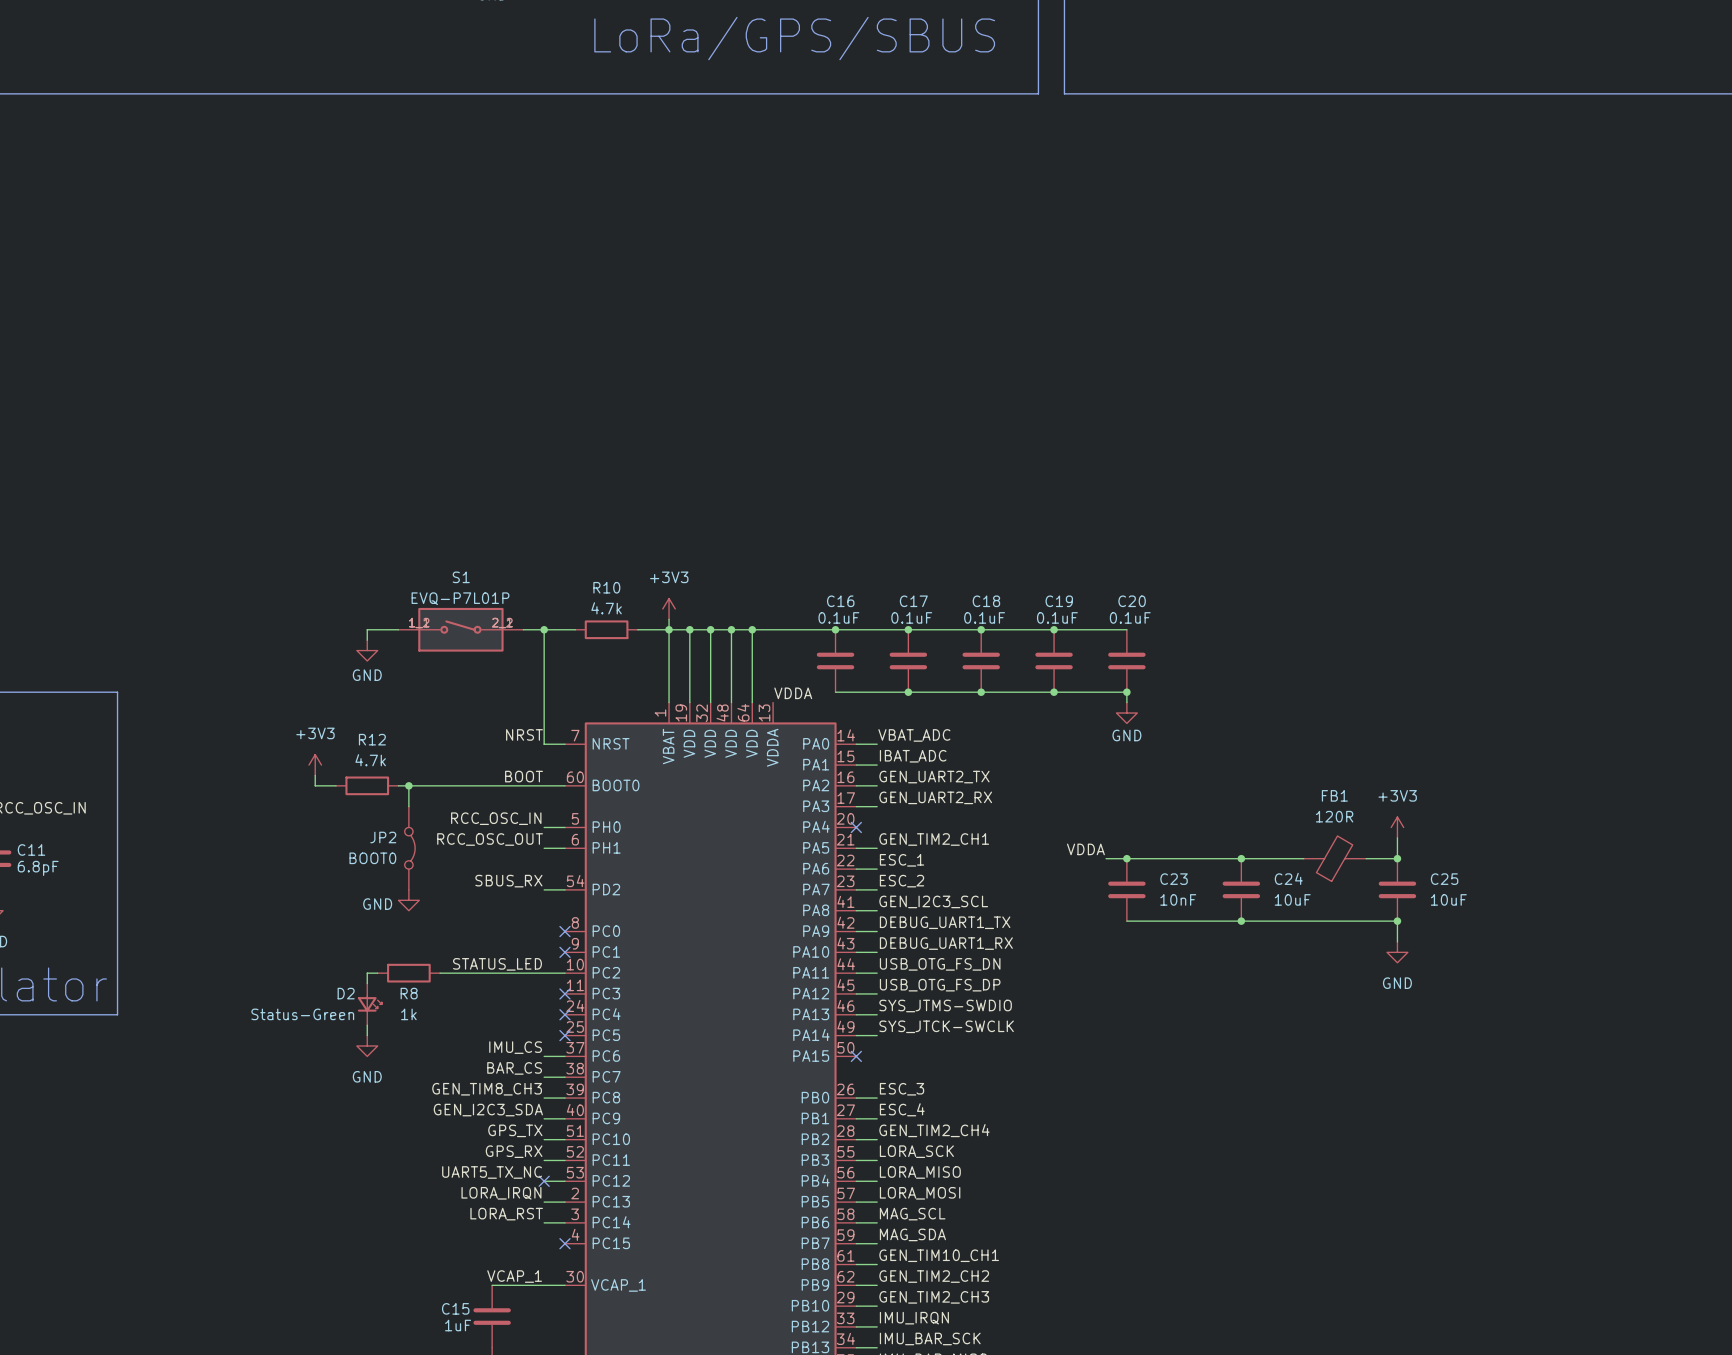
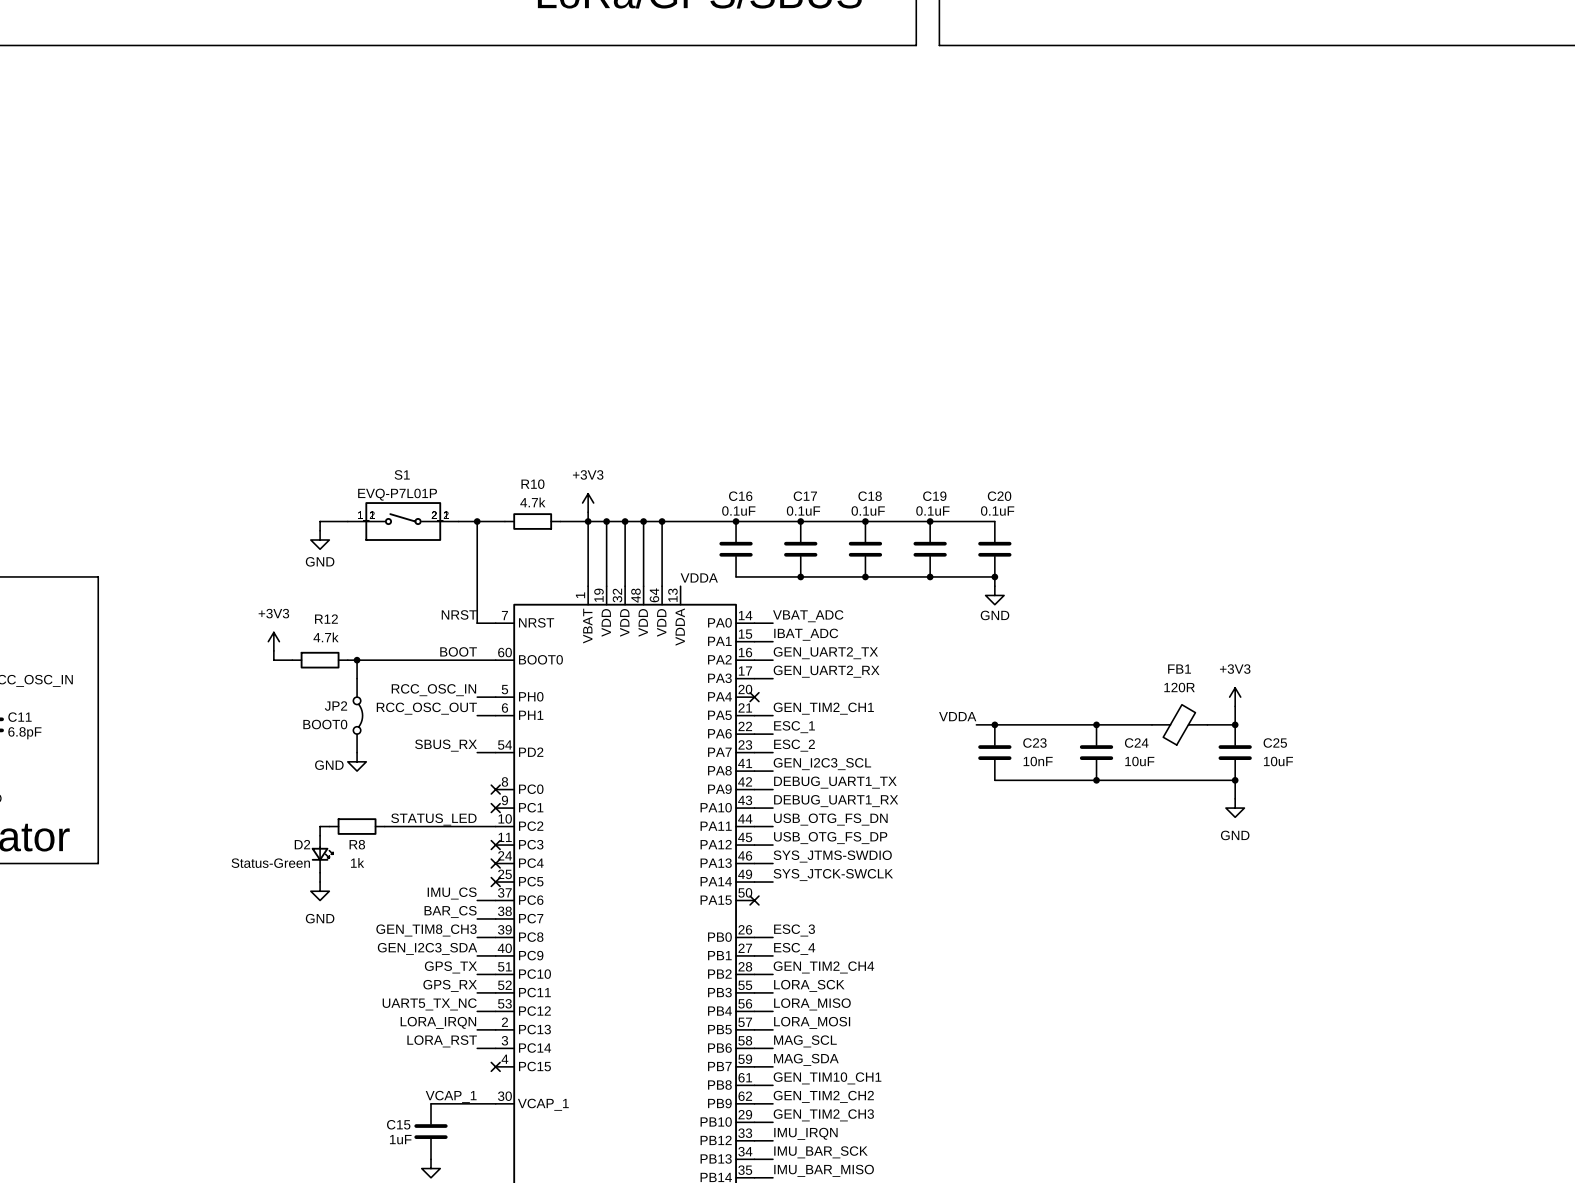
no-connect mark: (544, 1181) -> none

